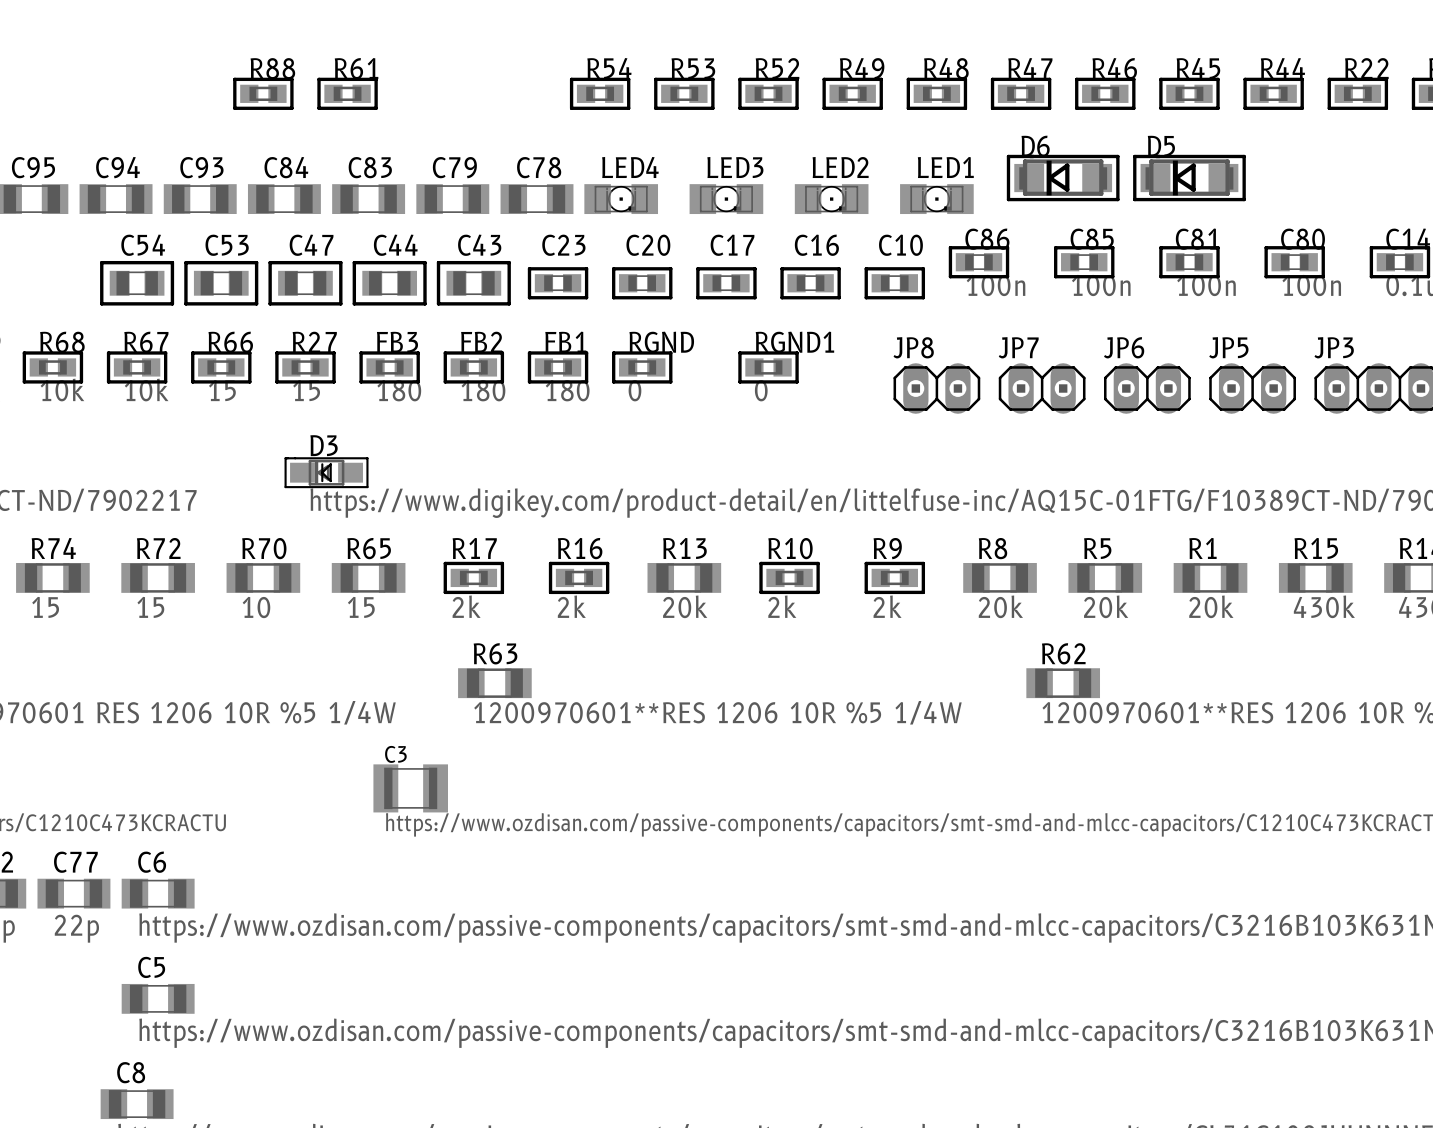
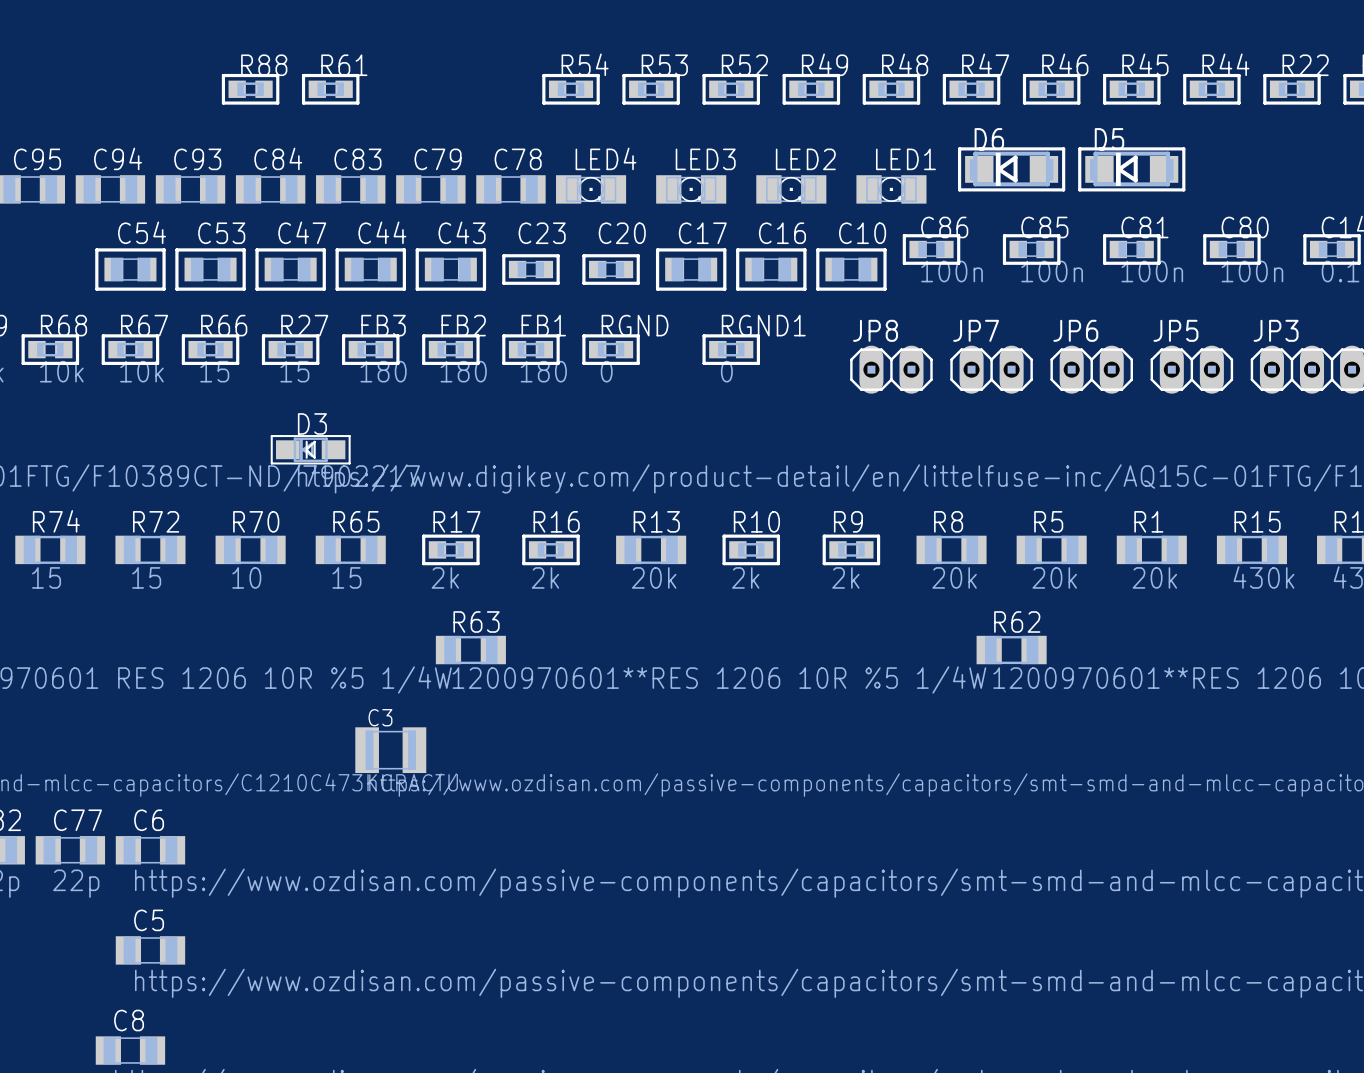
C17 footprint: [696, 267, 757, 300] -> [655, 248, 727, 291]
C16 footprint: [780, 267, 841, 300] -> [736, 248, 807, 291]
C10 footprint: [864, 267, 926, 300] -> [816, 248, 887, 291]

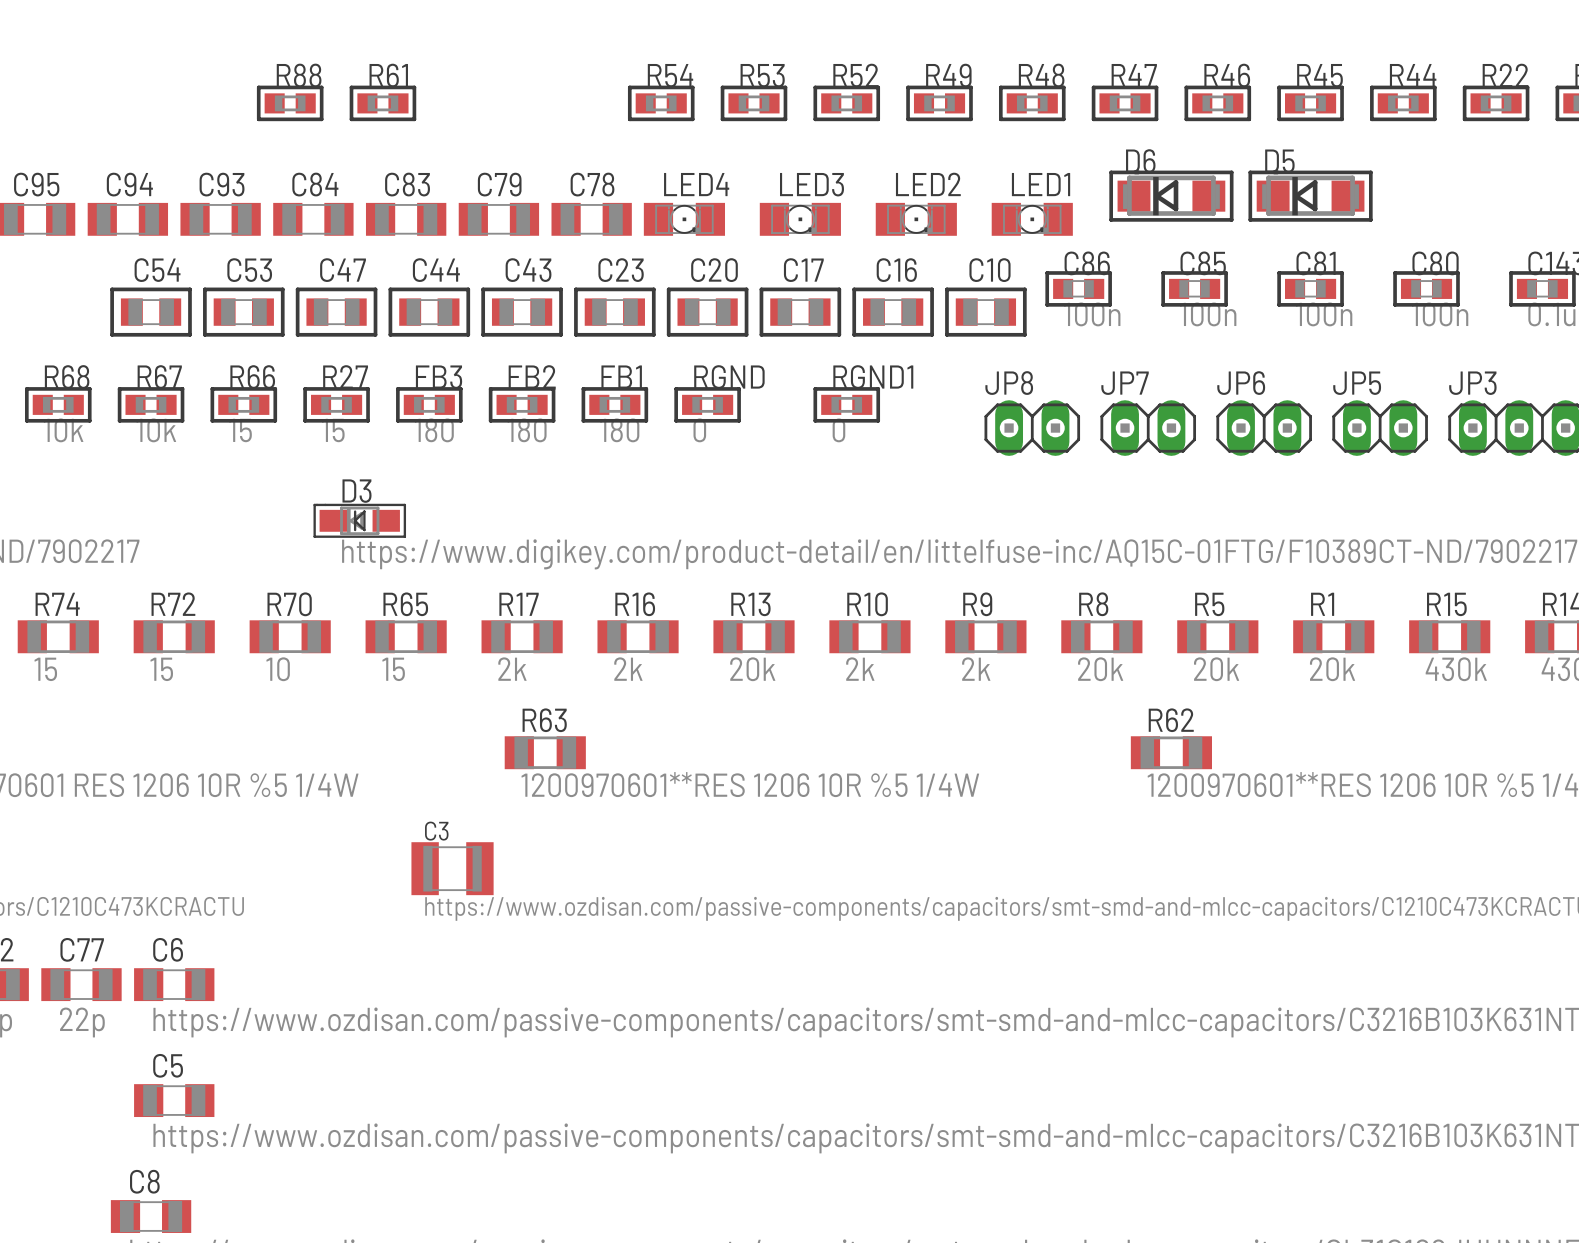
C23 footprint: [502, 254, 560, 285] -> [574, 287, 656, 337]
C20 footprint: [582, 254, 640, 285] -> [666, 287, 749, 337]
R17 footprint: [422, 534, 480, 566] -> [481, 620, 563, 654]
R16 footprint: [522, 534, 580, 566] -> [597, 620, 679, 654]
R10 footprint: [722, 534, 781, 566] -> [829, 620, 911, 654]
R9 footprint: [822, 534, 881, 566] -> [945, 620, 1027, 654]

